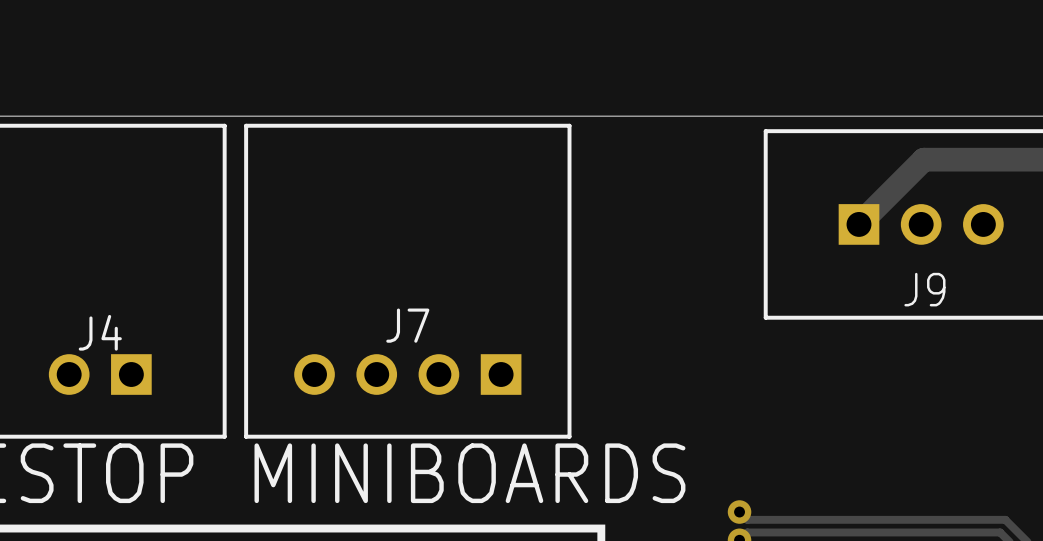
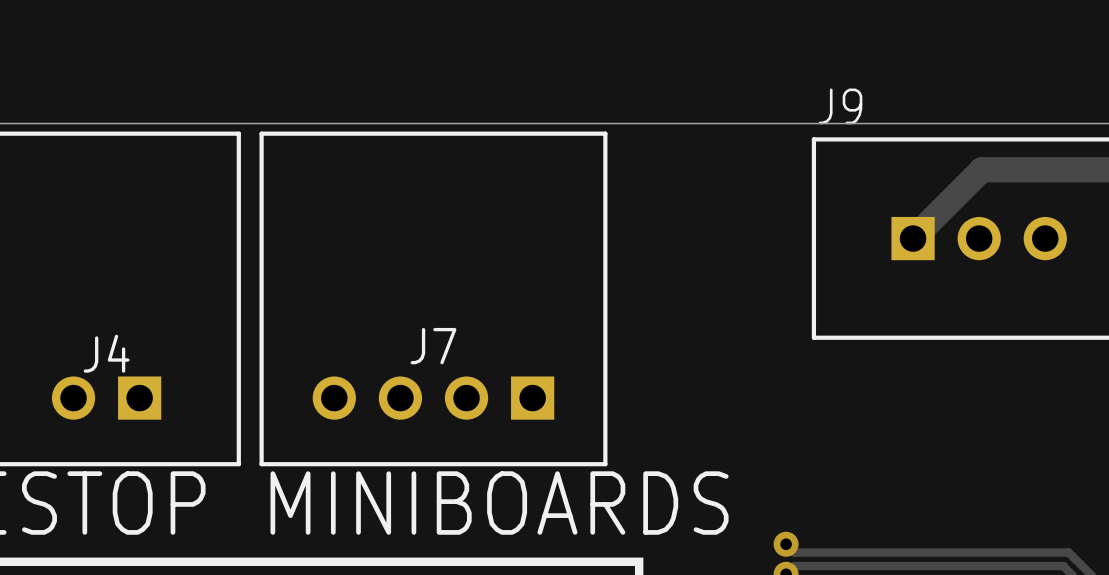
J9 name position: J9 (924, 289) -> J9 (840, 106)

